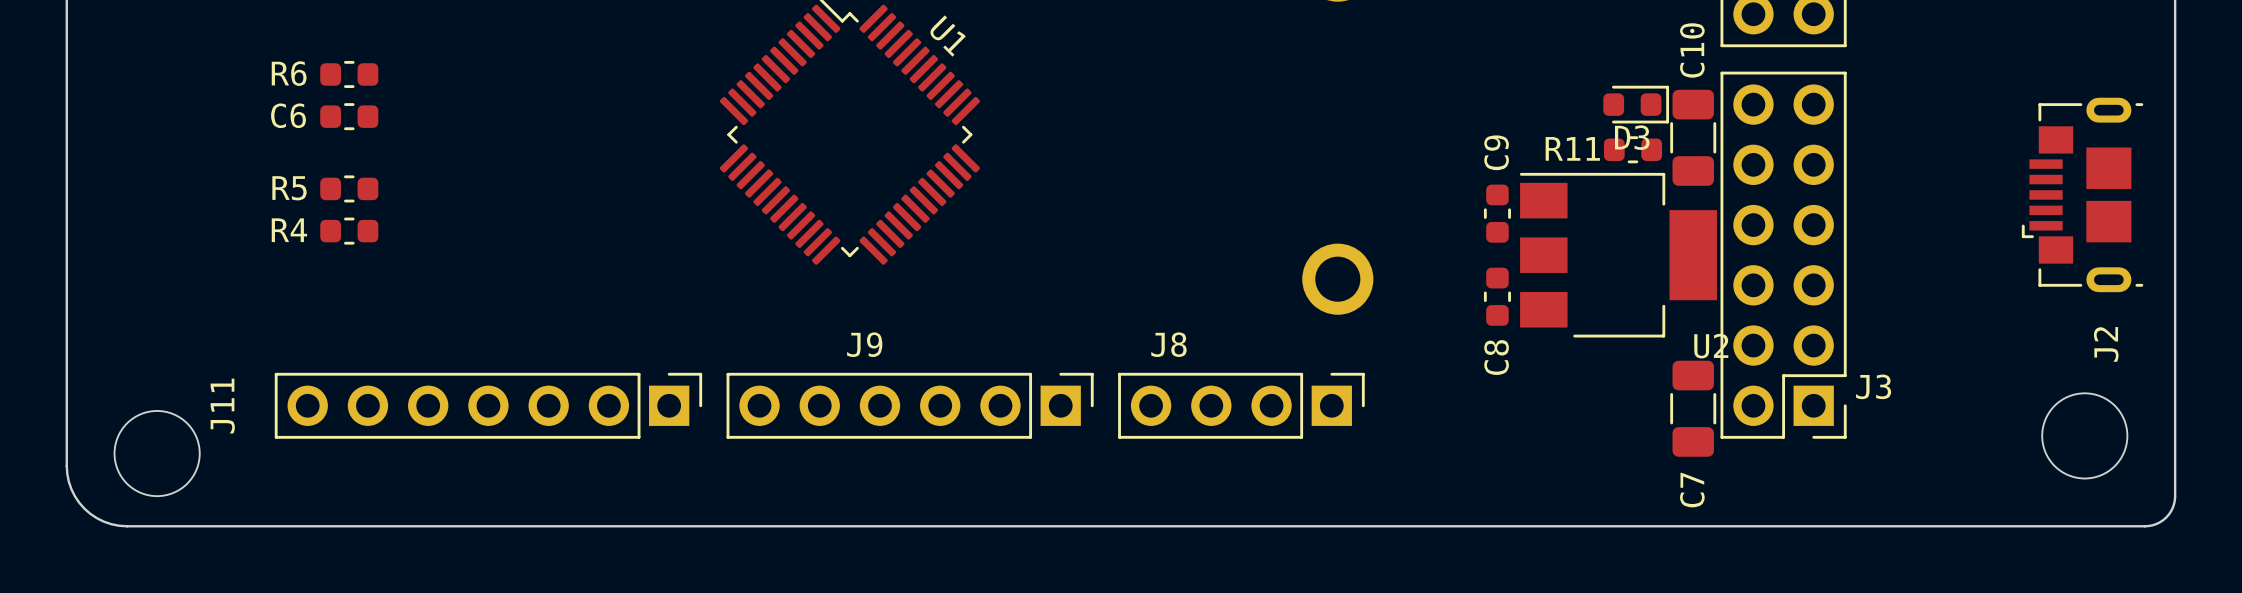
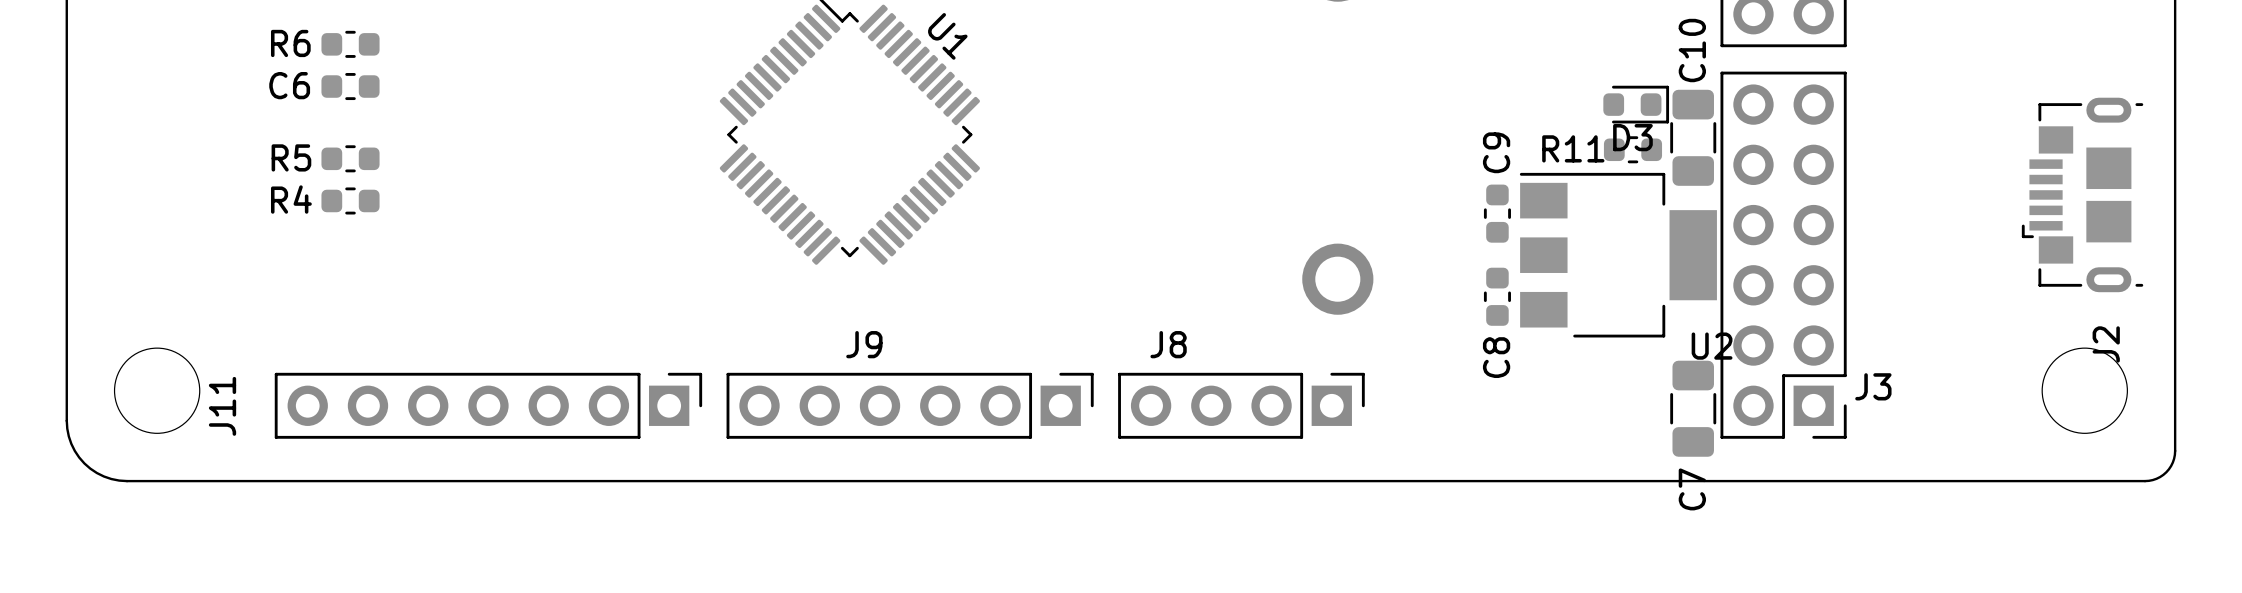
R6 position: (349, 74) -> (350, 44)
C6 position: (349, 116) -> (350, 86)
R5 position: (349, 188) -> (350, 158)
R4 position: (349, 231) -> (350, 200)
board edge: (66, 420) (67, 473) (74, 496) (84, 508) (96, 518) (111, 524) (127, 526) (2145, 526) (2160, 522) (2166, 517) (2172, 507) (2175, 496) (2175, 450) -> (66, 420) (71, 443) (84, 463) (103, 476) (127, 481) (2145, 481) (2156, 478) (2166, 472) (2172, 462) (2175, 450)
round board edge position: (2084, 435) -> (2084, 390)
round board edge position: (157, 453) -> (157, 390)

